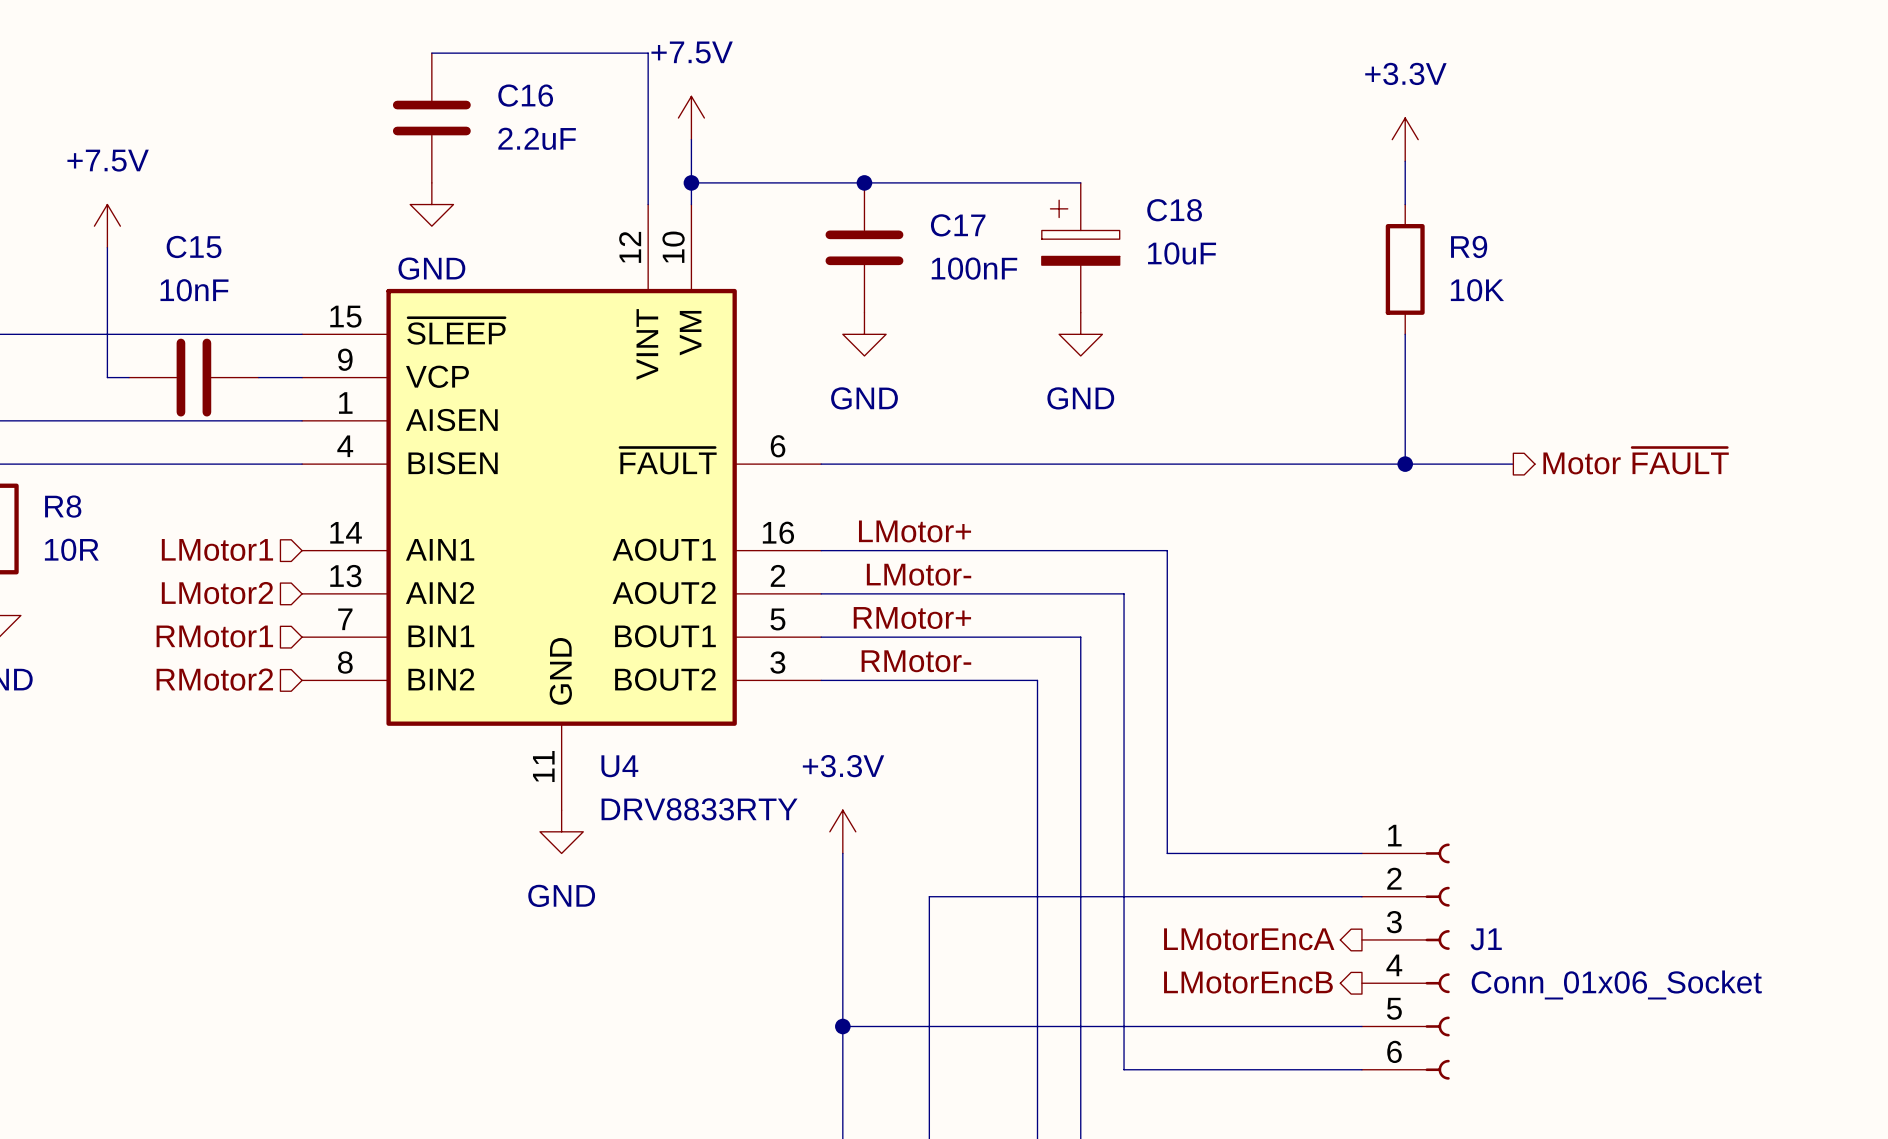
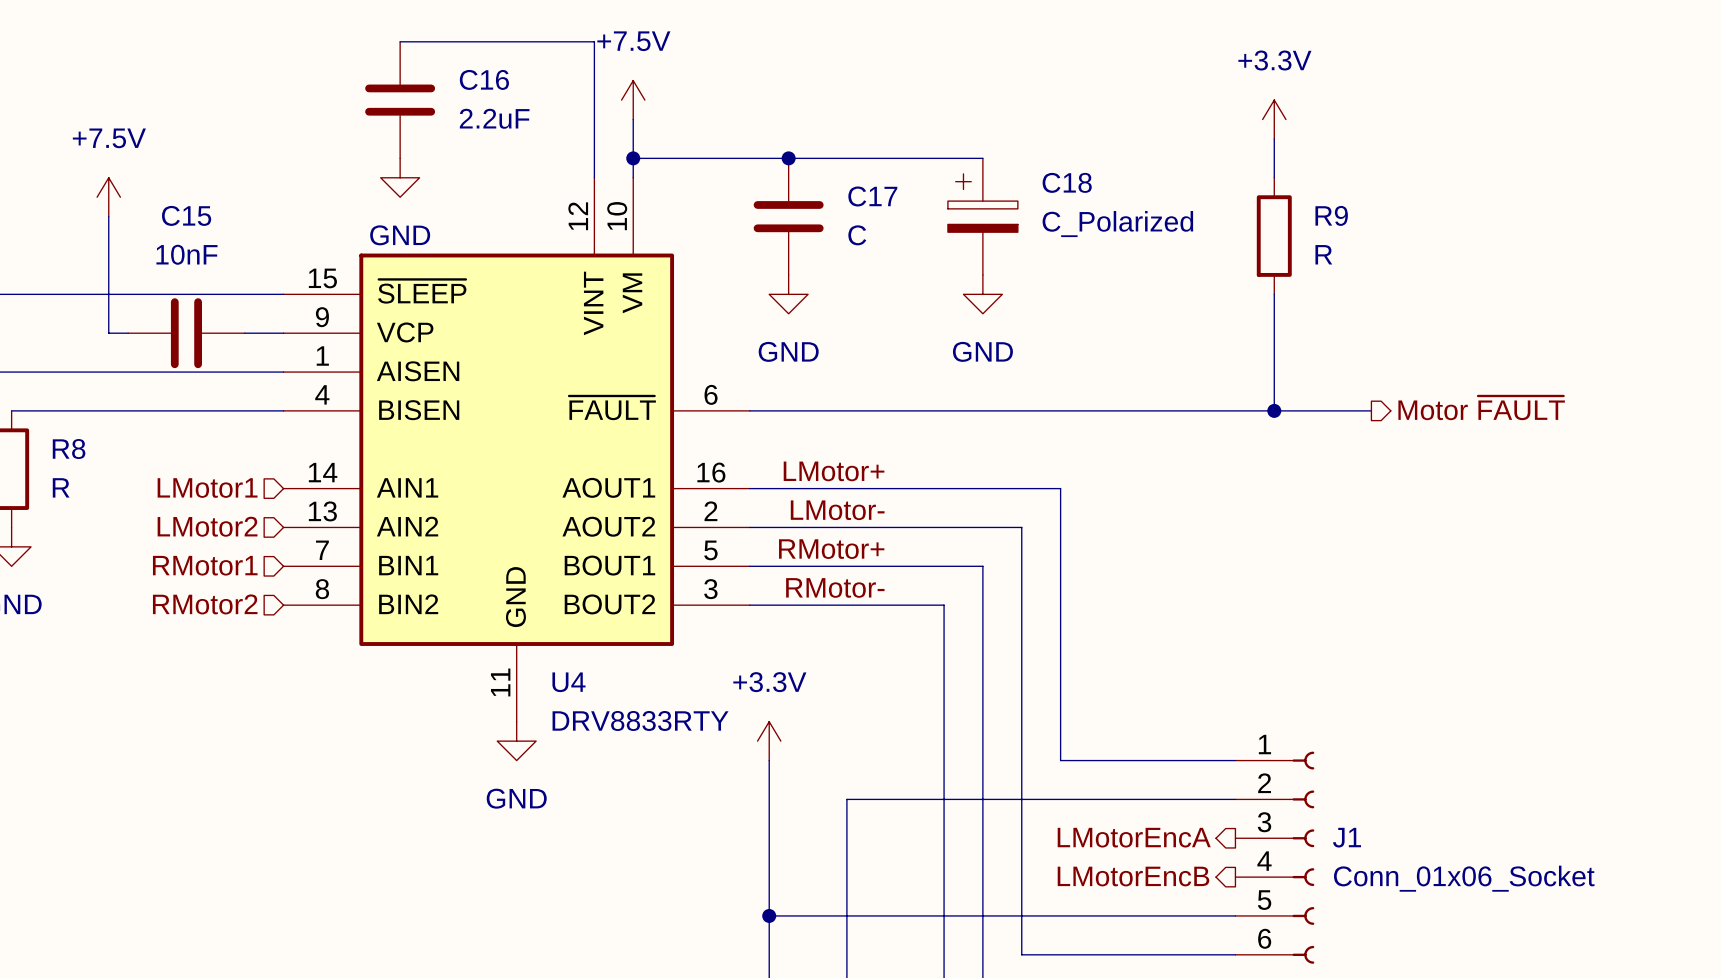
C18 value: 10uF (1182, 253) -> C_Polarized (1117, 224)
C17 value: 100nF (974, 268) -> C (857, 235)
R9 value: 10K (1477, 290) -> R (1323, 254)
R8 value: 10R (71, 549) -> R (61, 487)

